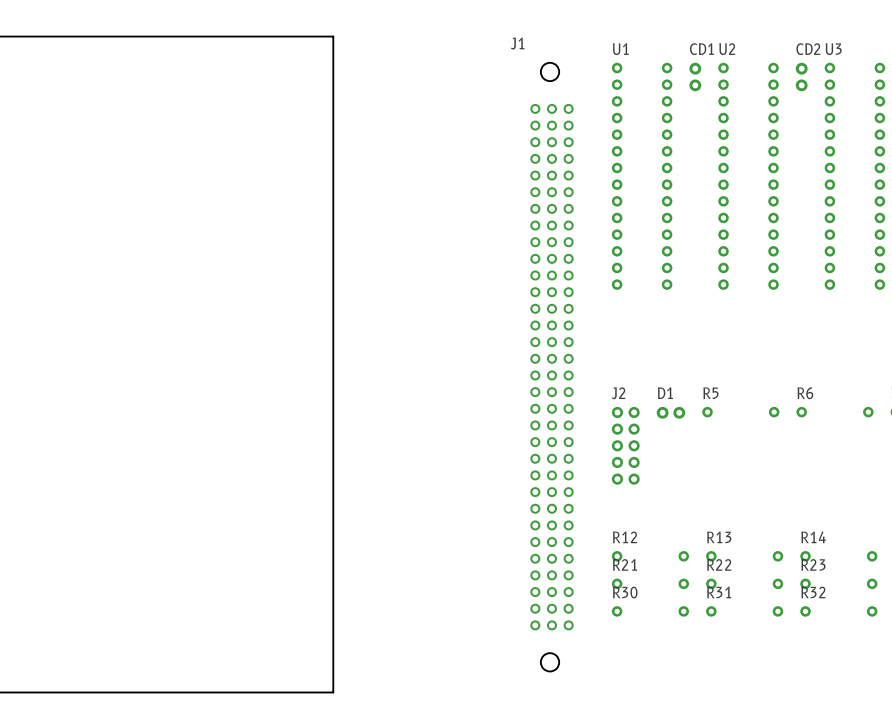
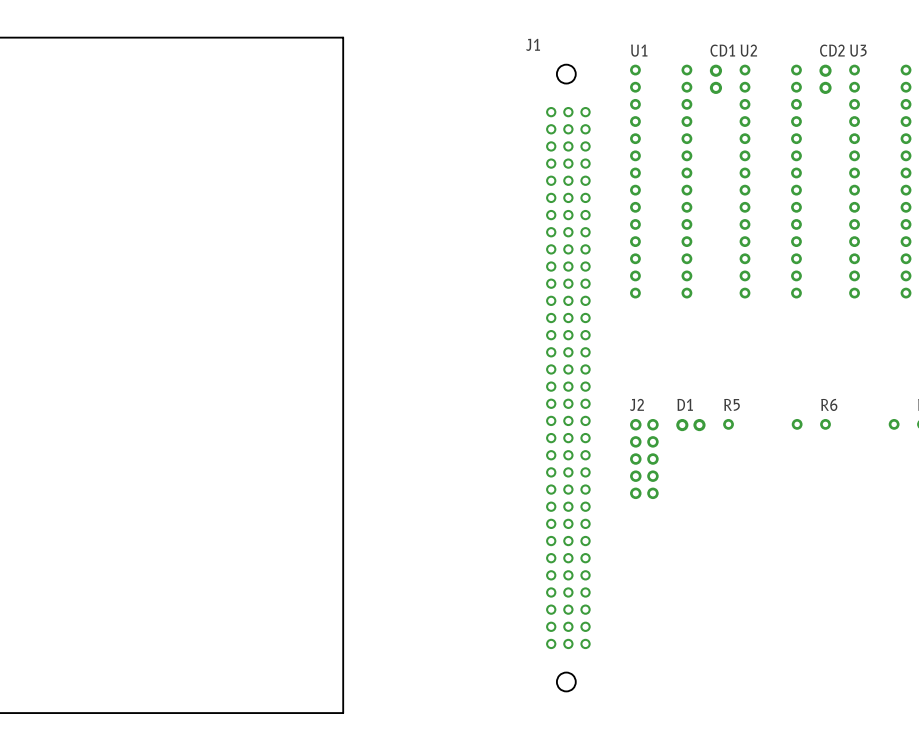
R12: (650, 556) -> none
R13: (744, 556) -> none
R14: (838, 556) -> none
R21: (650, 583) -> none
R22: (744, 583) -> none
R23: (838, 583) -> none
R30: (650, 611) -> none
R31: (744, 611) -> none
R32: (838, 611) -> none

